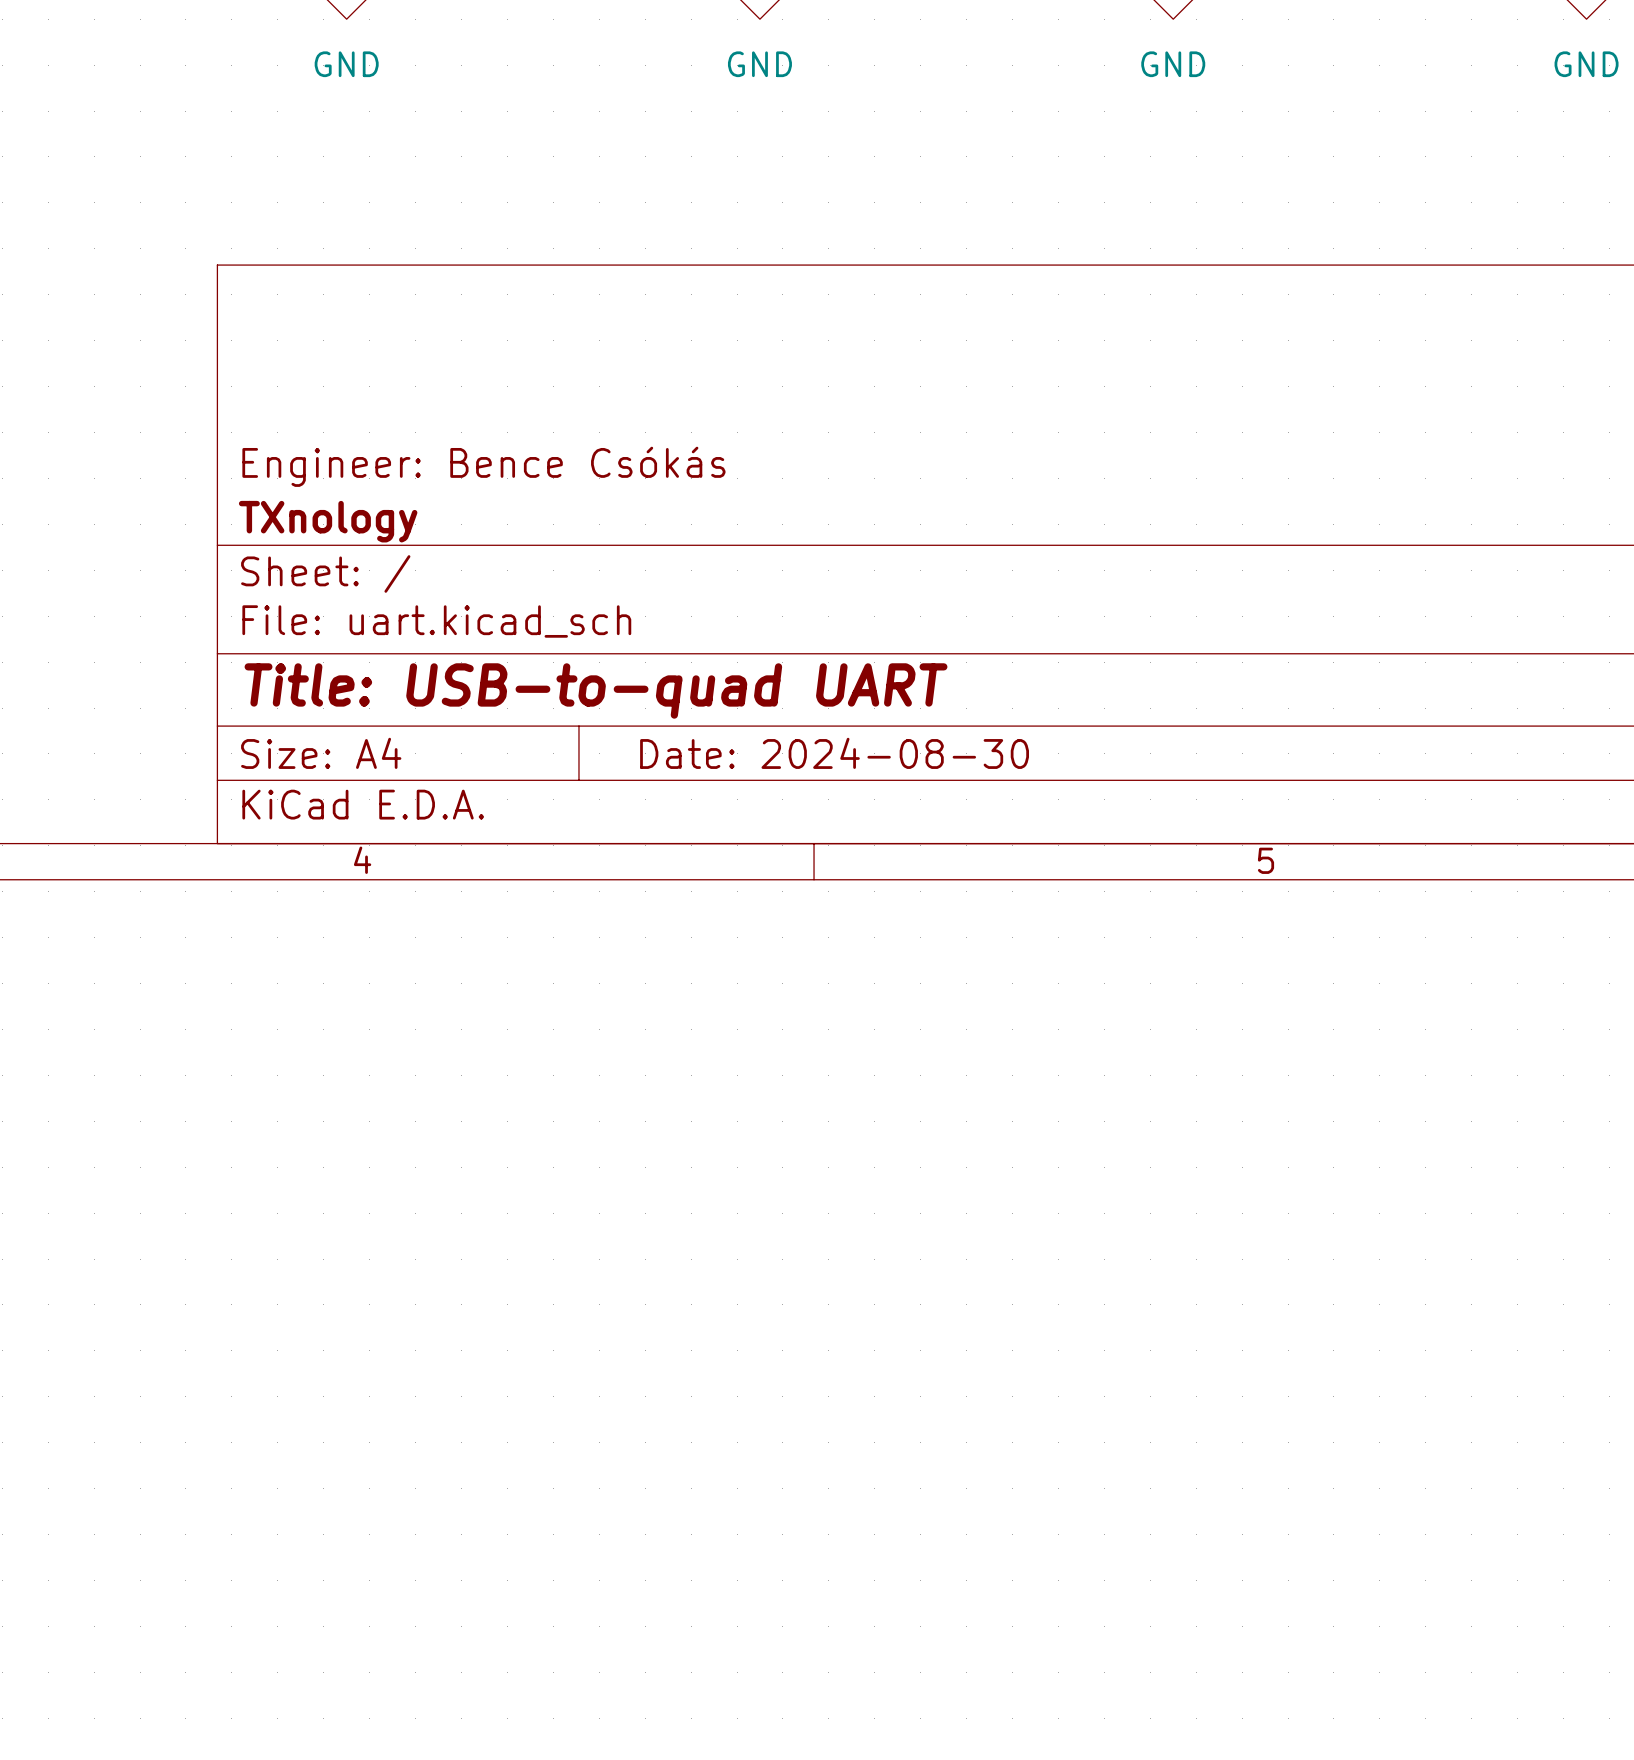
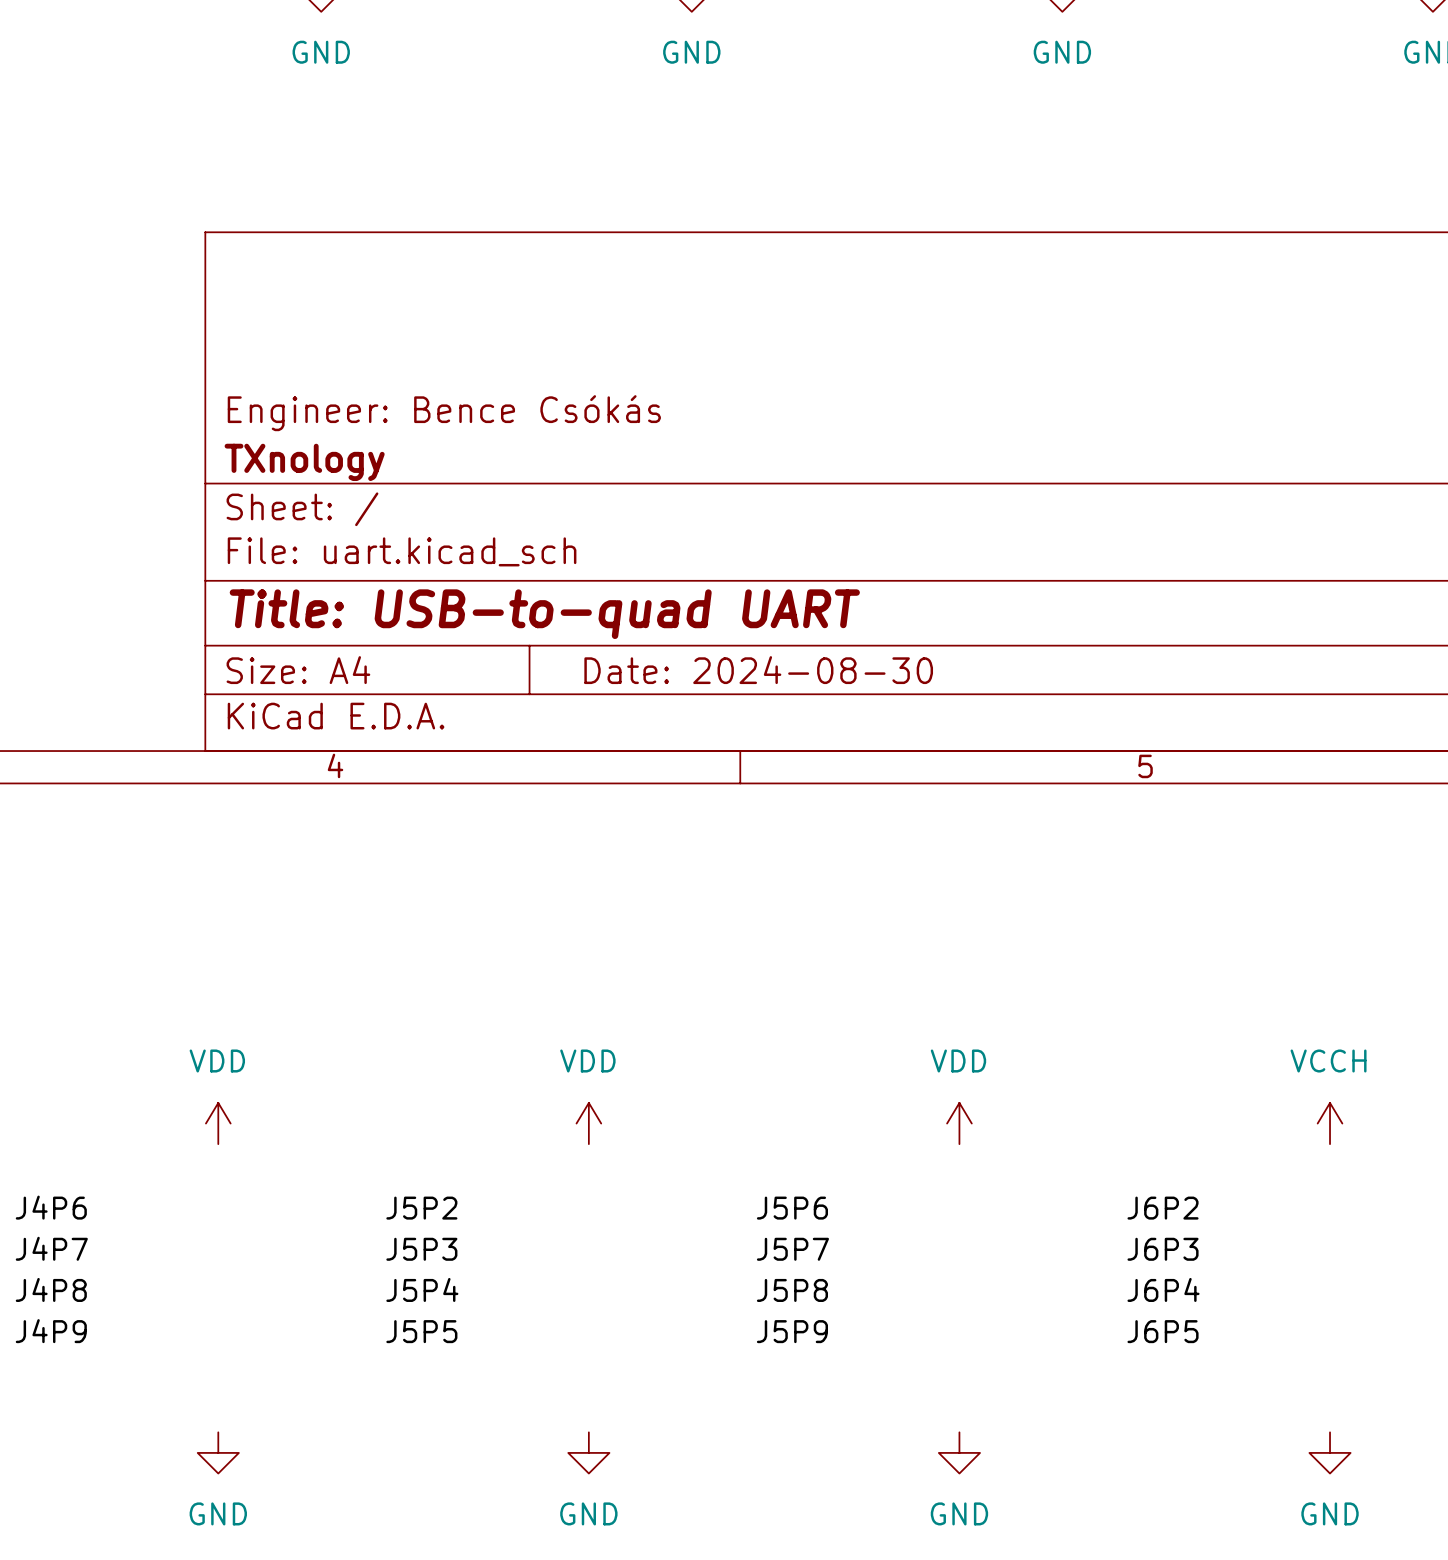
power symbol: none -> VDD (218, 1123)
power symbol: none -> VDD (588, 1123)
power symbol: none -> VDD (959, 1123)
power symbol: none -> VCCH (1330, 1123)
label: none -> J4P6 (51, 1207)
label: none -> J5P2 (421, 1208)
label: none -> J5P6 (792, 1208)
label: none -> J6P2 (1163, 1208)
label: none -> J4P7 (51, 1248)
label: none -> J5P3 (421, 1249)
label: none -> J5P7 (792, 1249)
label: none -> J6P3 (1163, 1249)
label: none -> J4P8 (51, 1289)
label: none -> J5P4 (422, 1289)
label: none -> J6P4 (1163, 1289)
label: none -> J5P8 (792, 1290)
label: none -> J4P9 (51, 1331)
label: none -> J5P5 (421, 1331)
label: none -> J5P9 (792, 1331)
label: none -> J6P5 (1163, 1331)
power symbol: none -> GND (218, 1452)
power symbol: none -> GND (588, 1452)
power symbol: none -> GND (959, 1452)
power symbol: none -> GND (1330, 1452)

